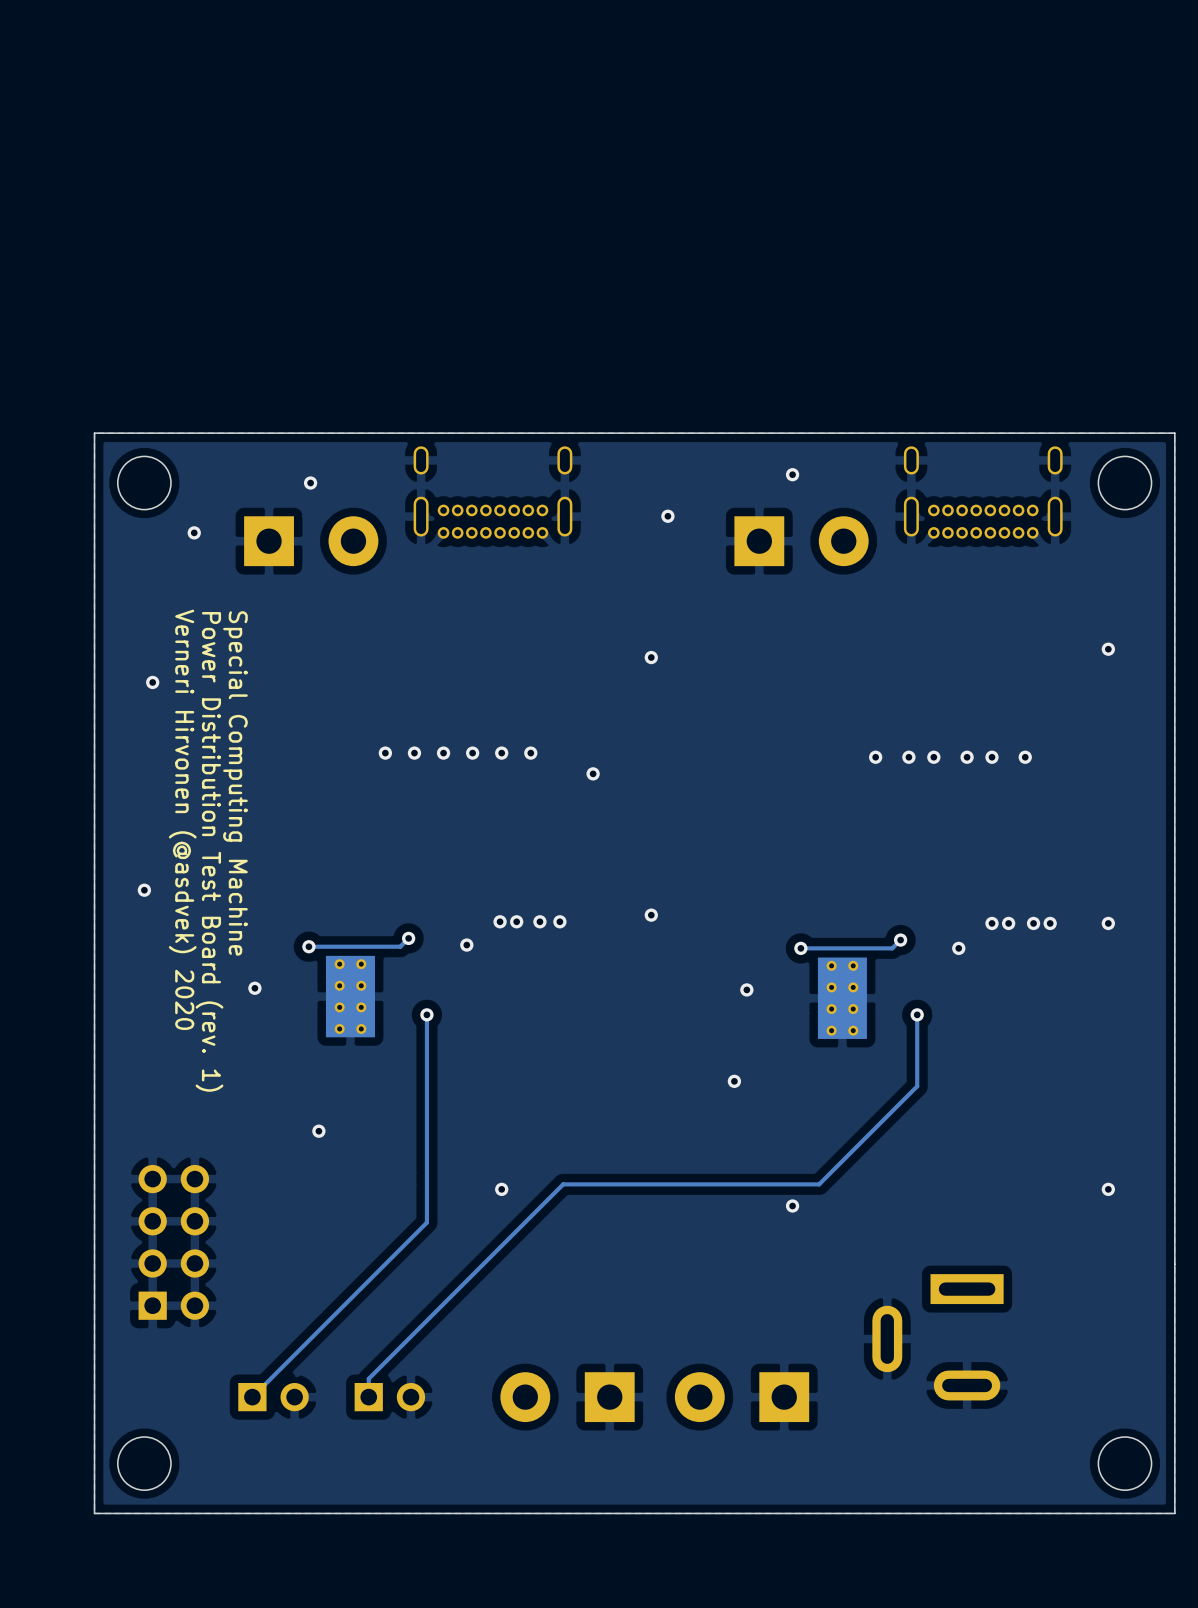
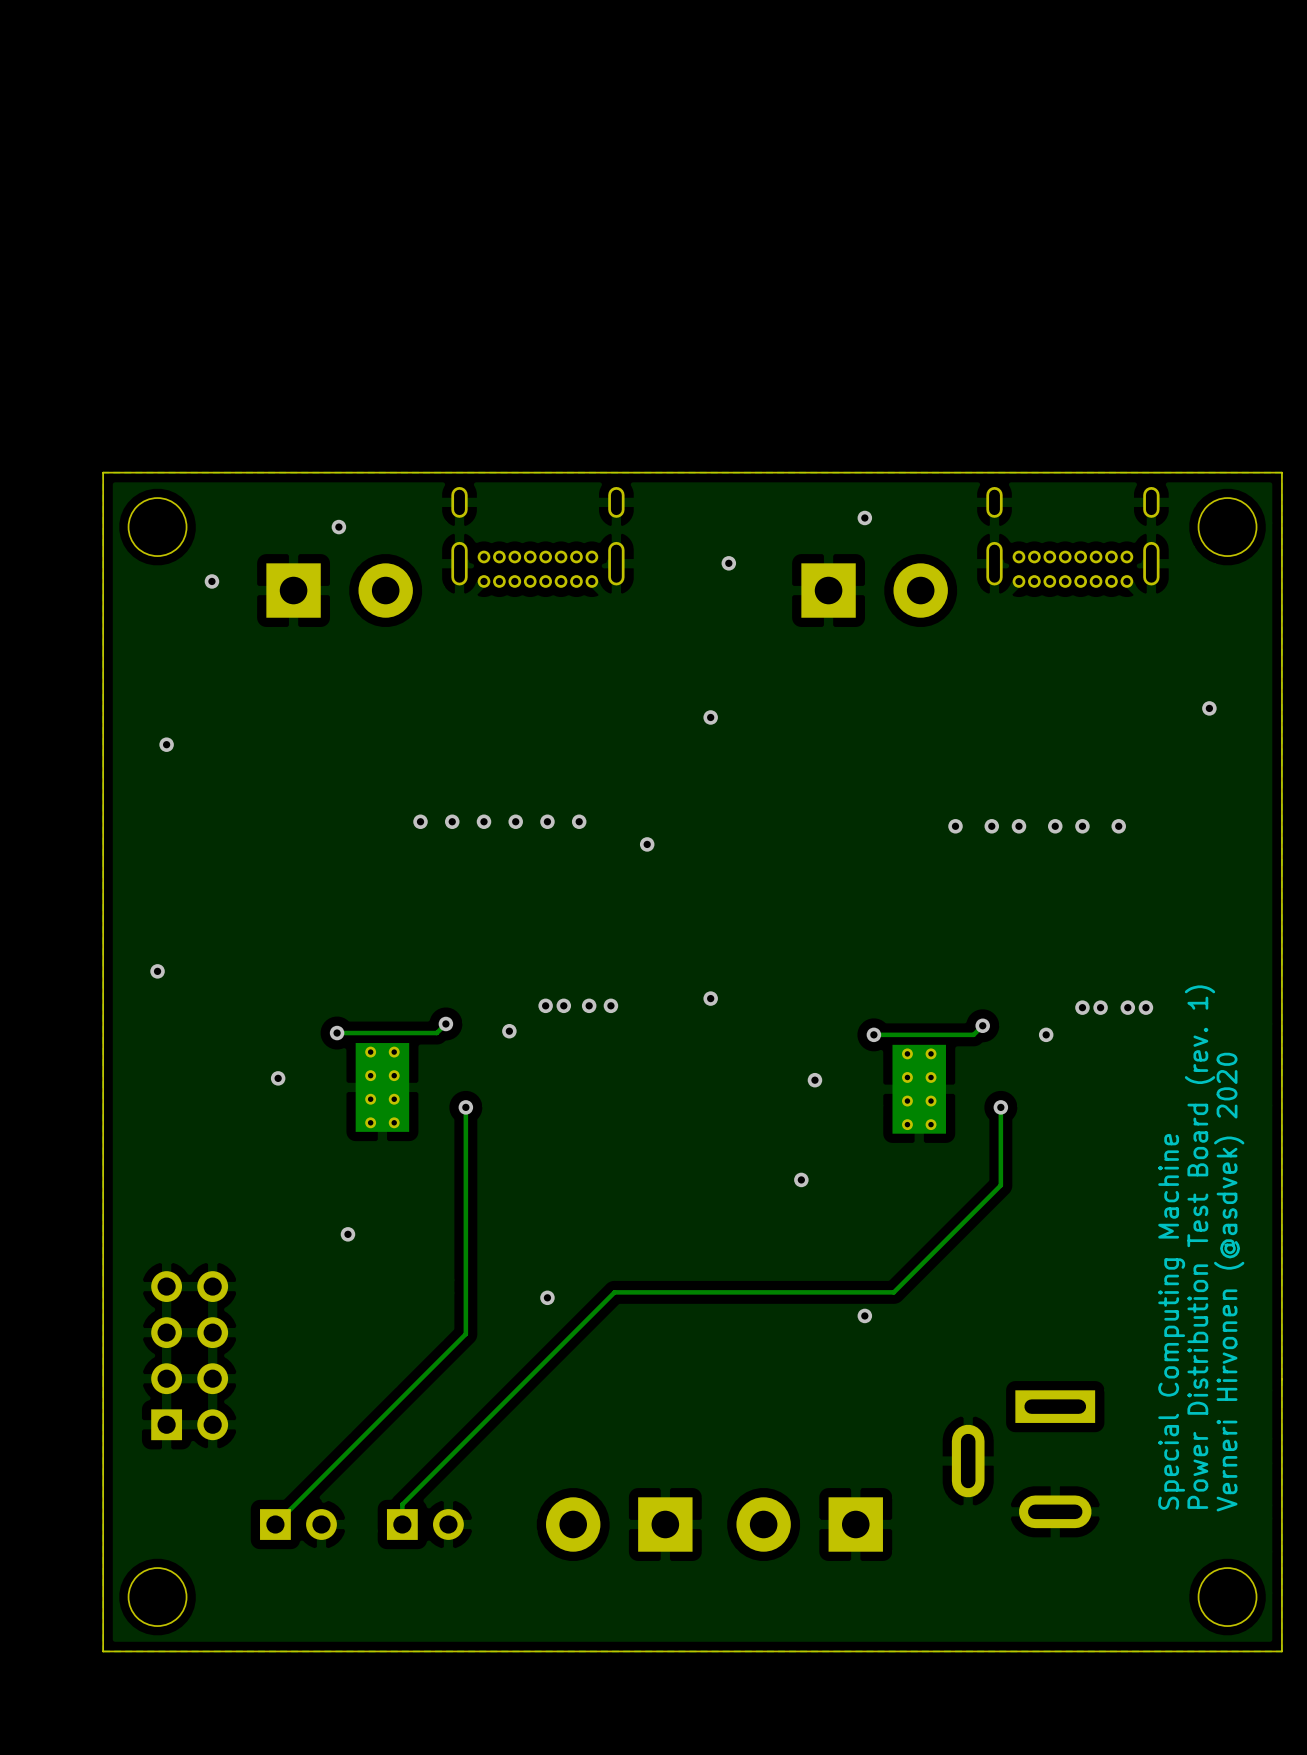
text: Special Computing Machine (235, 783) -> none
text: Verneri Hirvonen (@asdvek) 2020 (182, 819) -> none
text: Power Distribution Test Board (rev. 1) (209, 851) -> none
via: (1108, 923) -> none
text: none -> Power Distribution Test Board (rev. 1) (1200, 1247)
text: none -> Verneri Hirvonen (@asdvek) 2020 (1229, 1282)
via: (1108, 1189) -> none
text: none -> Special Computing Machine (1171, 1321)

